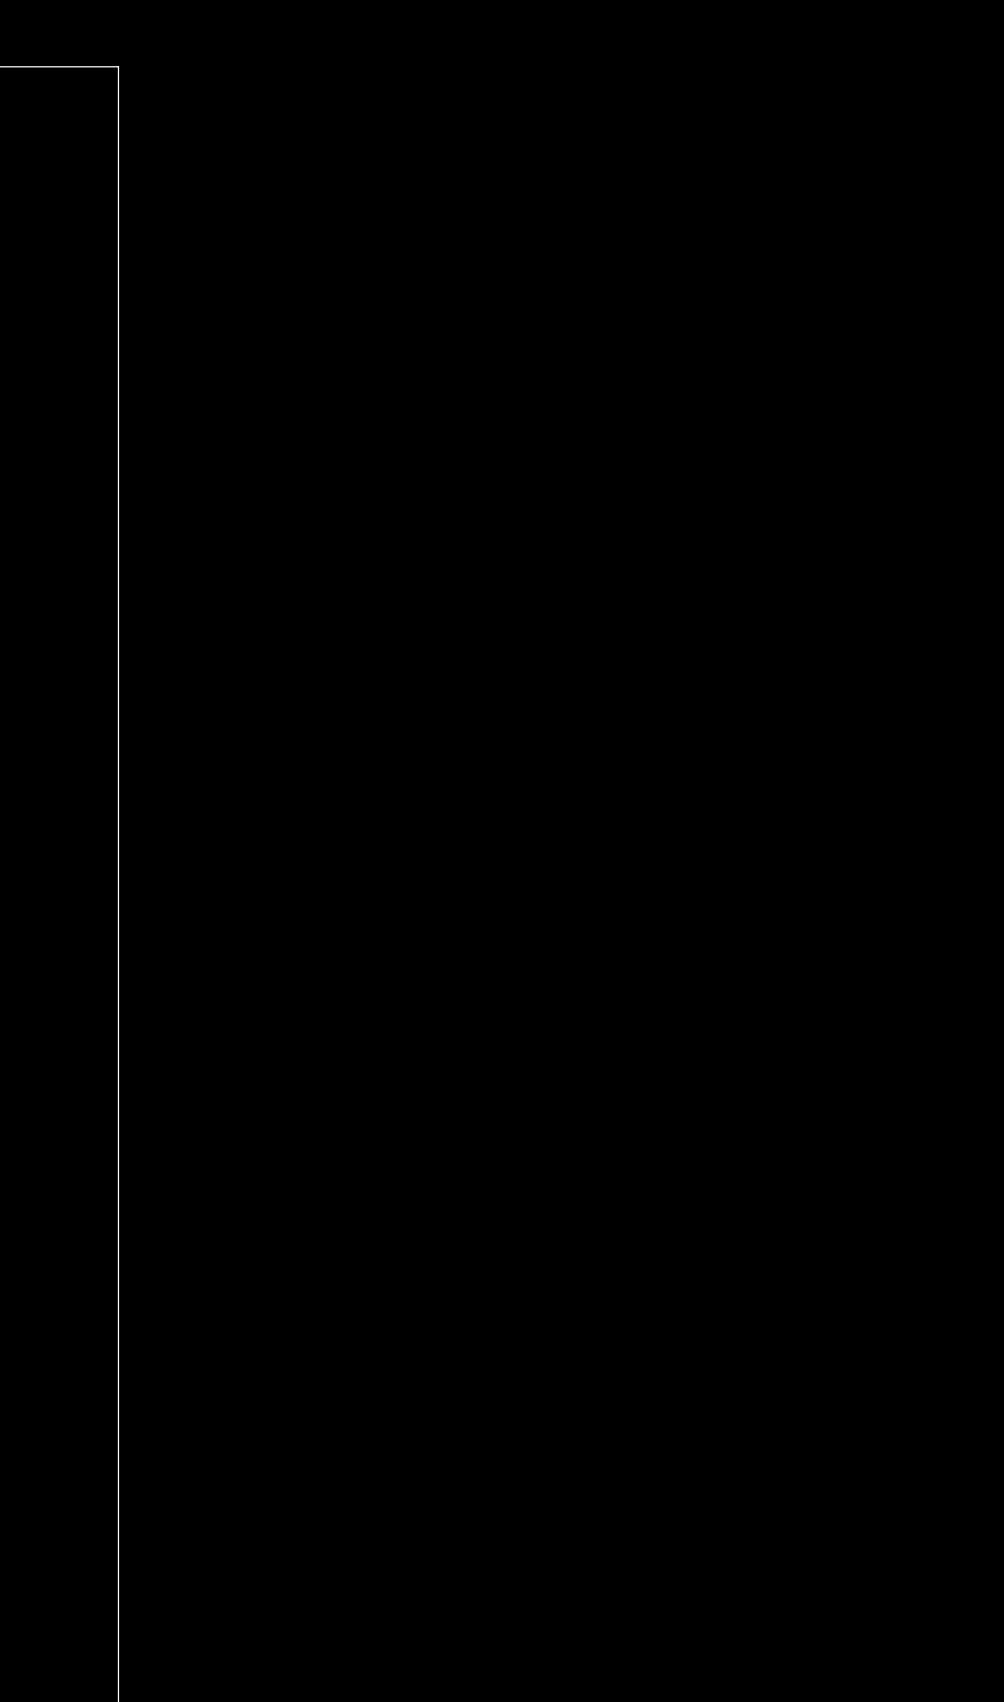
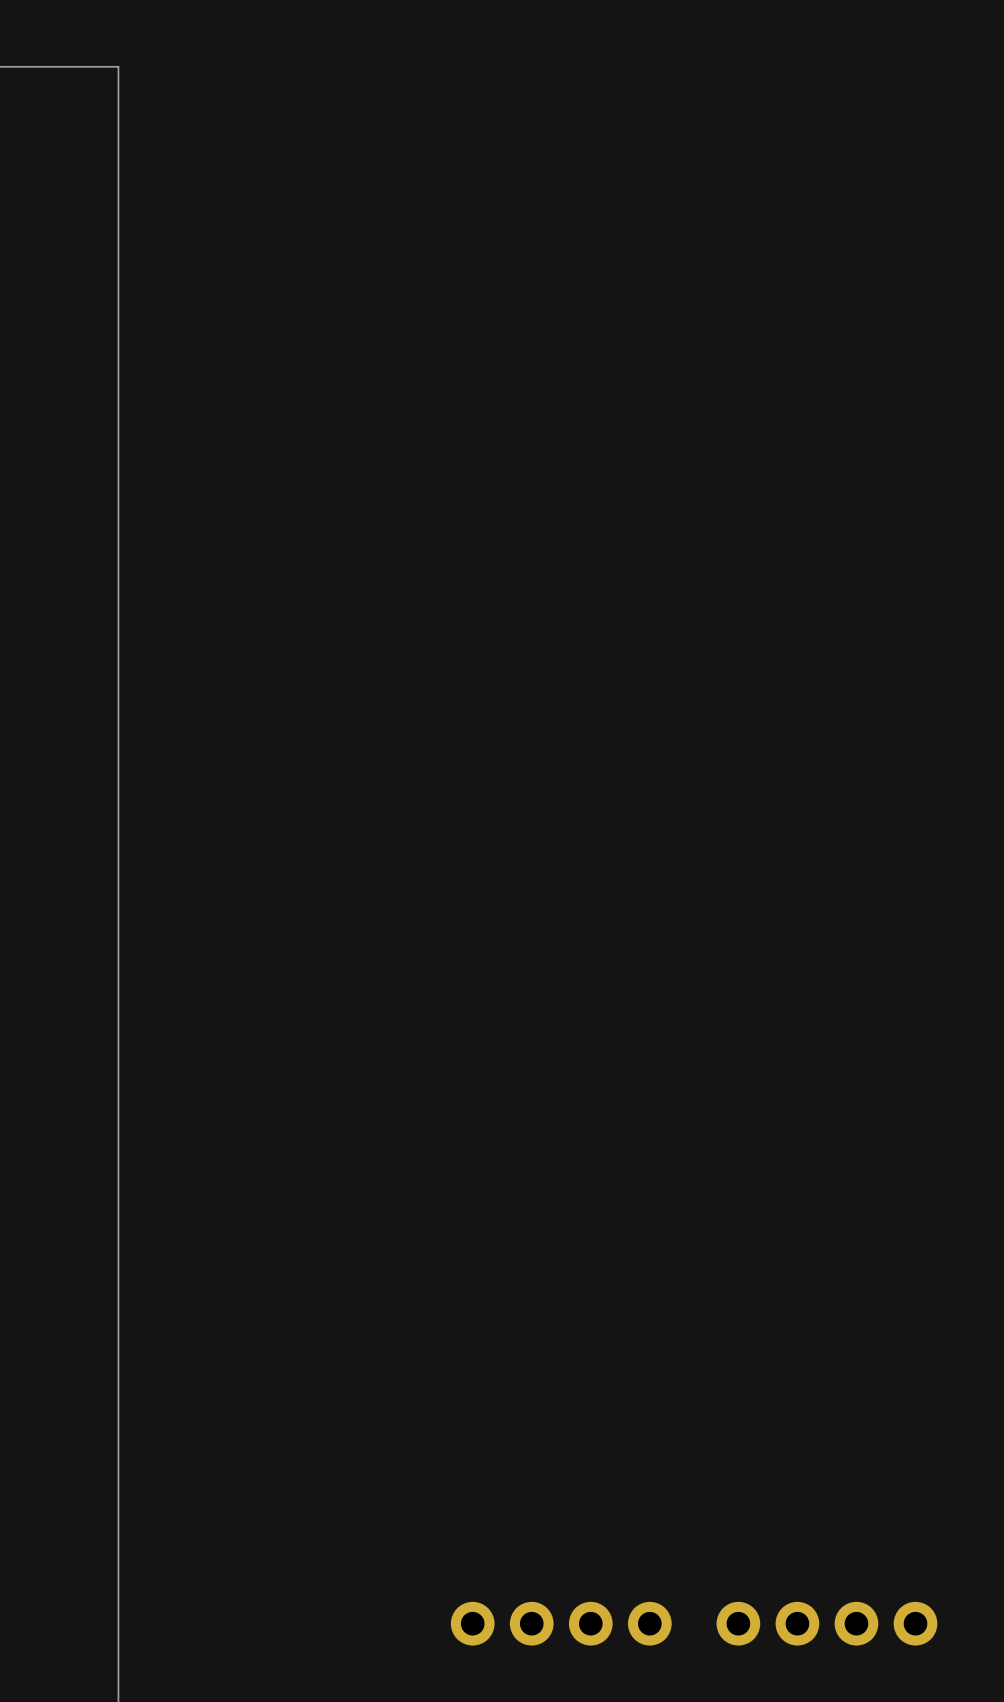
part: none -> (561, 1623)
part: none -> (826, 1623)

